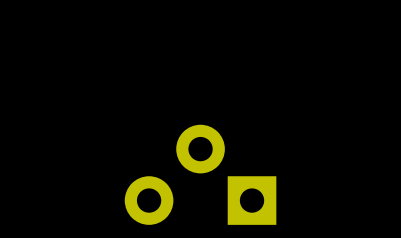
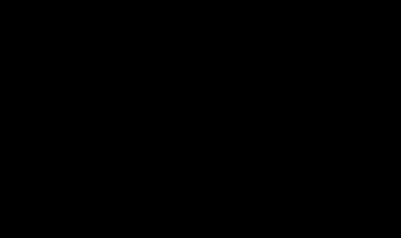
part: (200, 174) -> none

